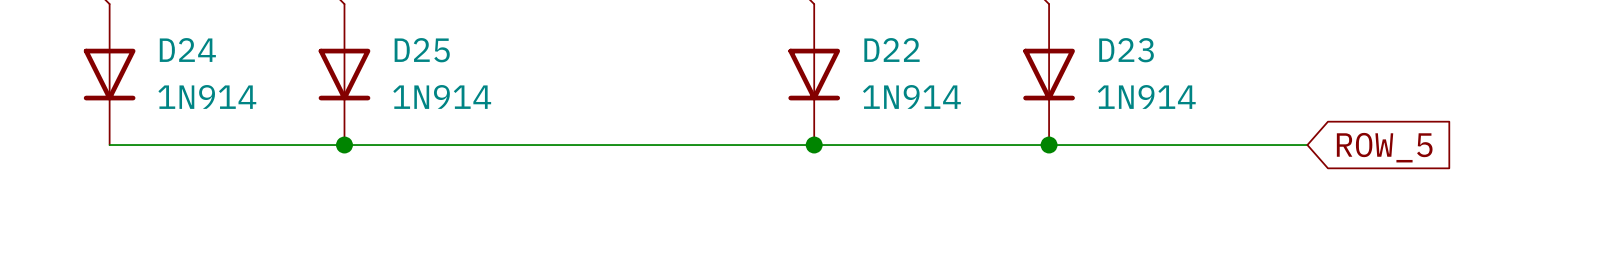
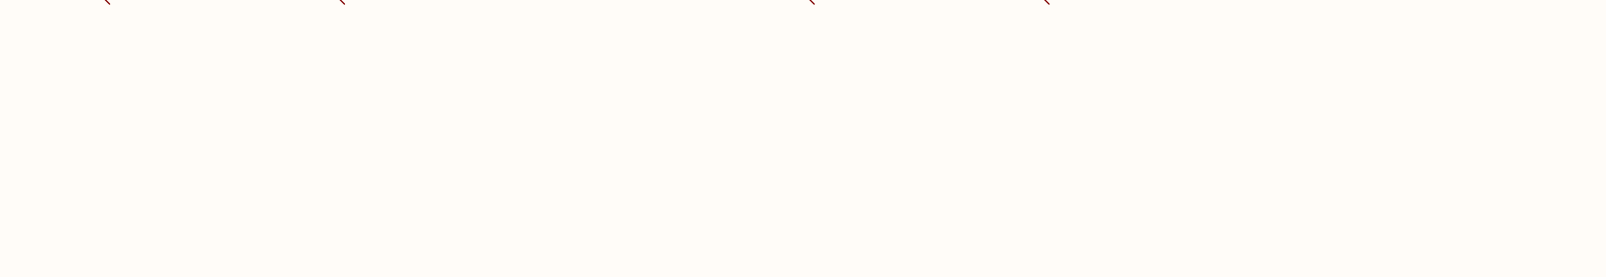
D24: 1N914 (109, 74) -> none
D25: 1N914 (344, 74) -> none
D22: 1N914 (814, 74) -> none
D23: 1N914 (1049, 74) -> none
wire: (109, 145) (1307, 145) -> none
junction: (344, 145) -> none
junction: (814, 145) -> none
junction: (1049, 145) -> none
global label: ROW_5 (1384, 147) -> none

